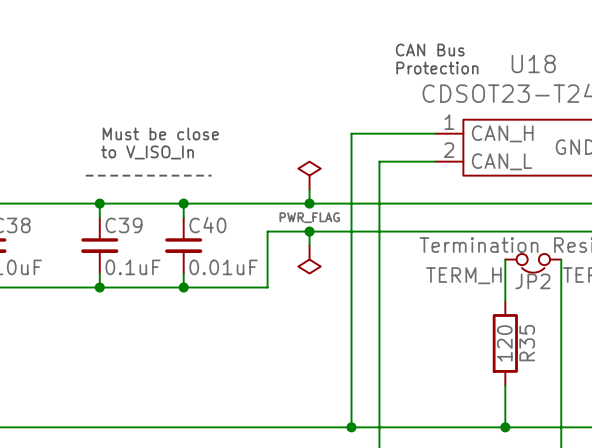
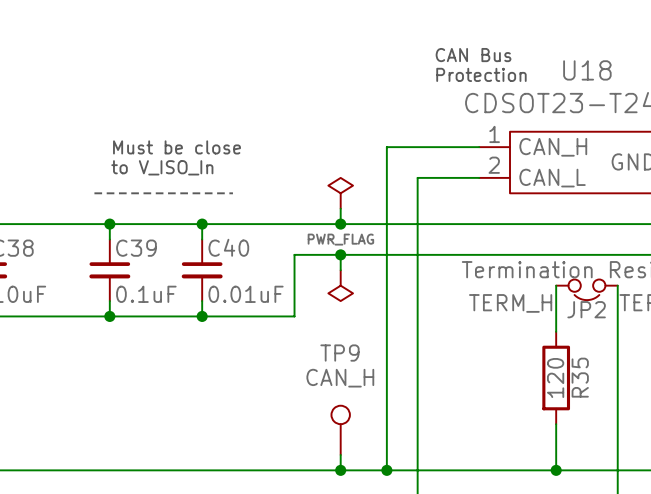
TP9: none -> CAN_H (340, 430)
wire: none -> (340, 454) (340, 470)
junction: none -> (340, 470)

